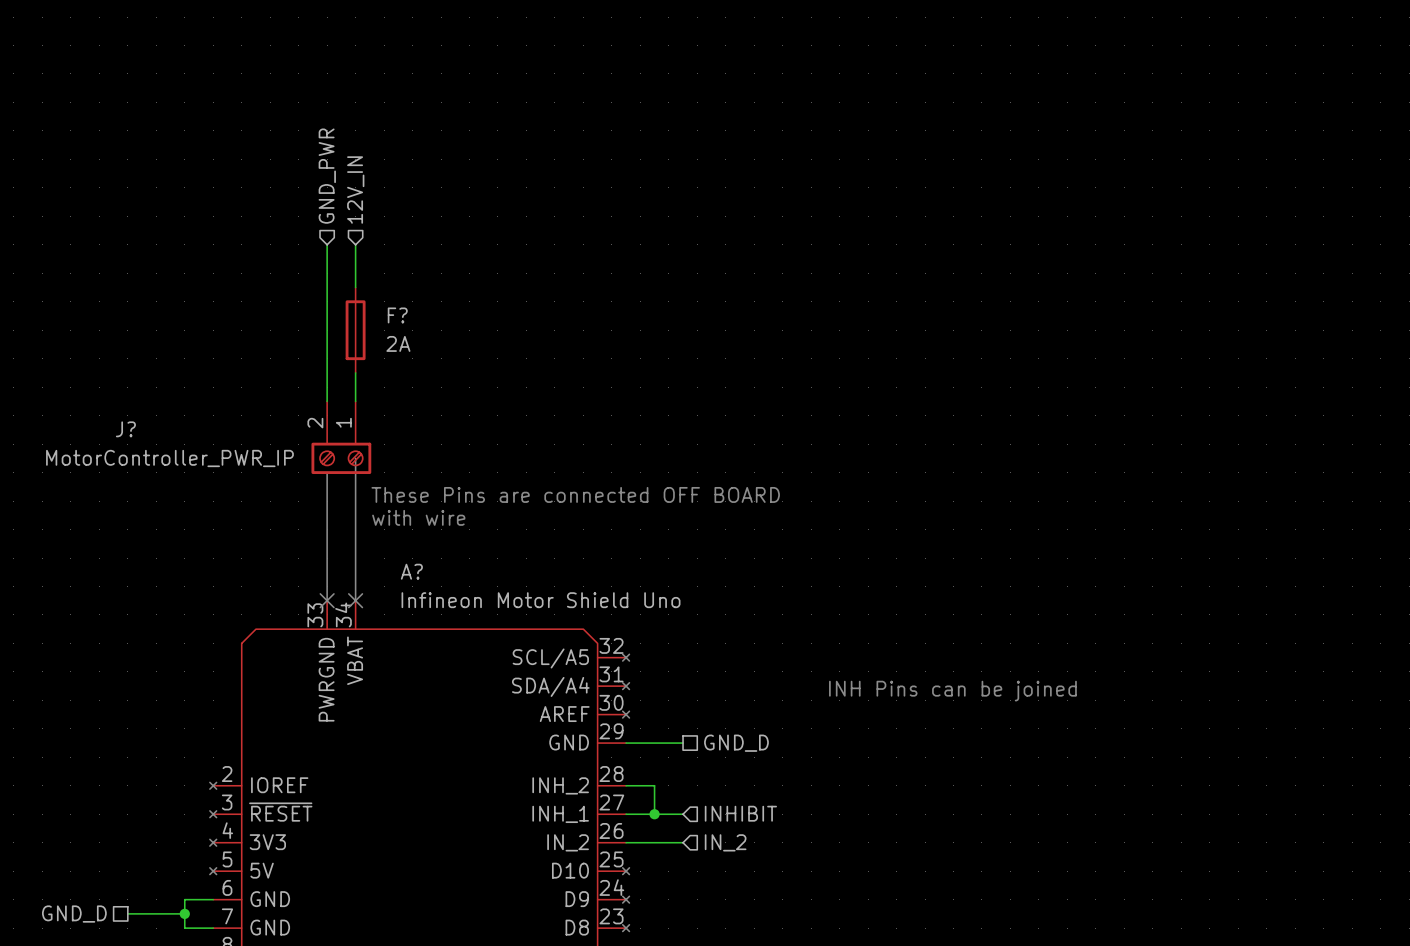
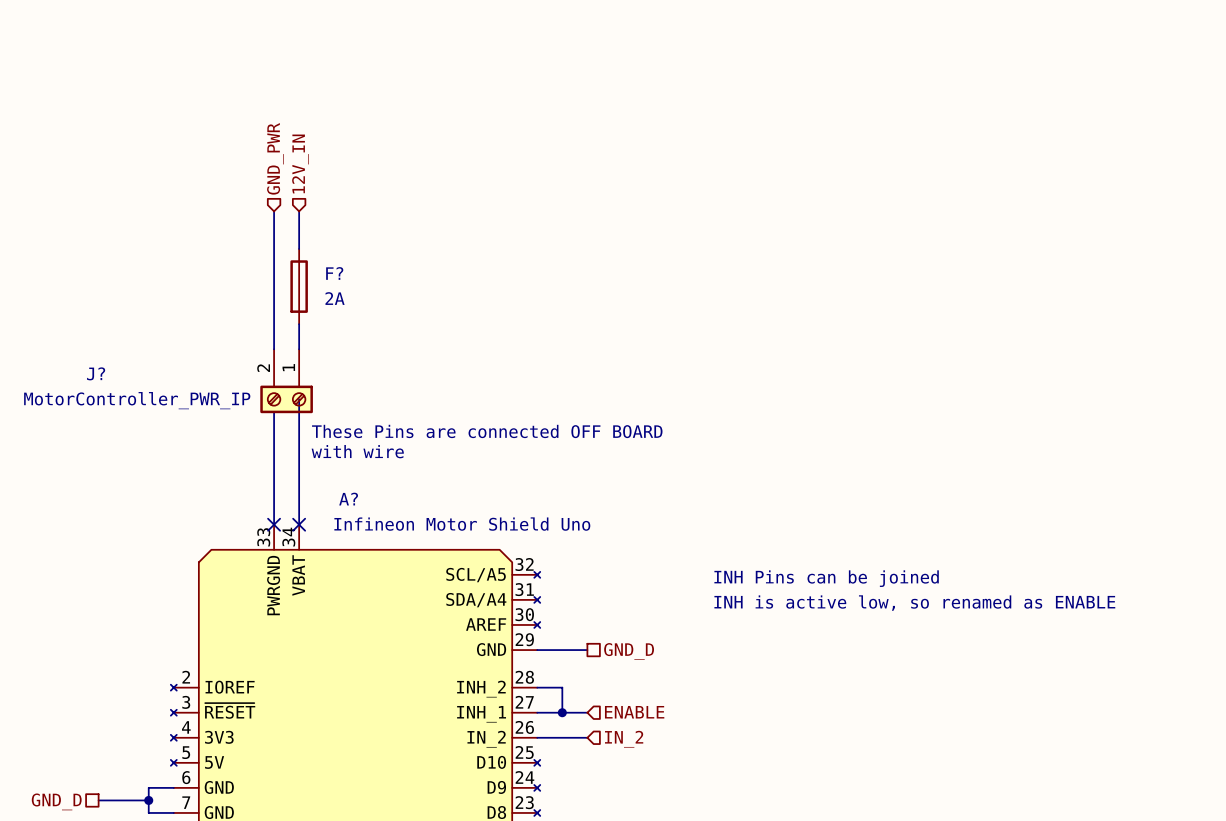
text: none -> INH Pins can be joined (826, 578)
text: INH Pins can be joined (952, 691) -> INH is active low, so renamed as ENABLE (914, 603)
hierarchical label: INHIBIT (740, 813) -> ENABLE (634, 712)

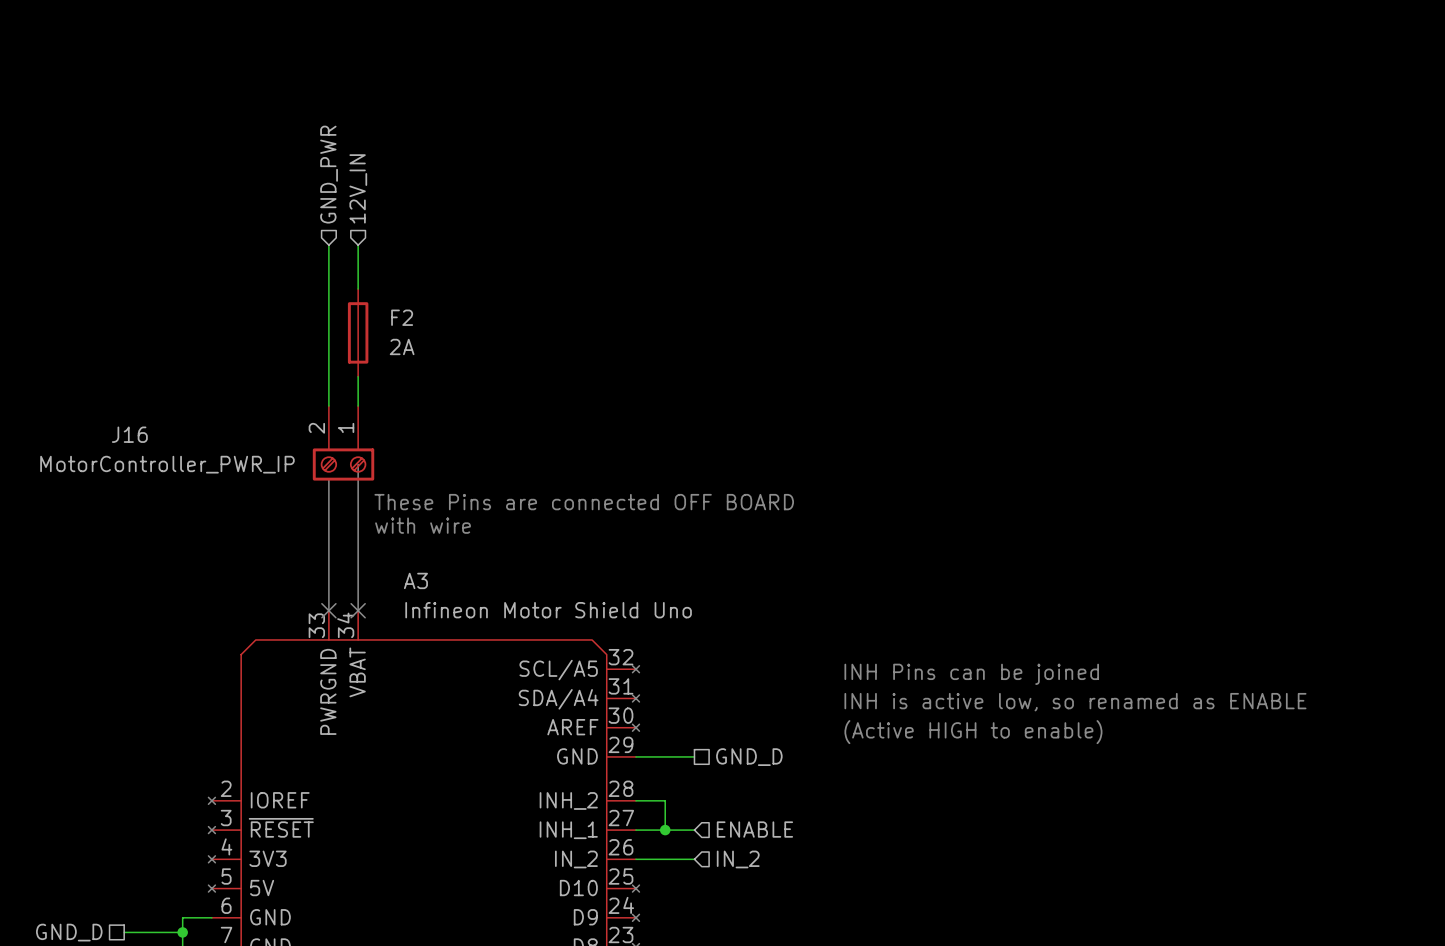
F? name: F? (334, 273) -> F2 (402, 317)
J? name: J? (96, 373) -> J16 (129, 434)
A? name: A? (348, 499) -> A3 (415, 580)
text: none -> (Active HIGH to enable) (973, 732)

